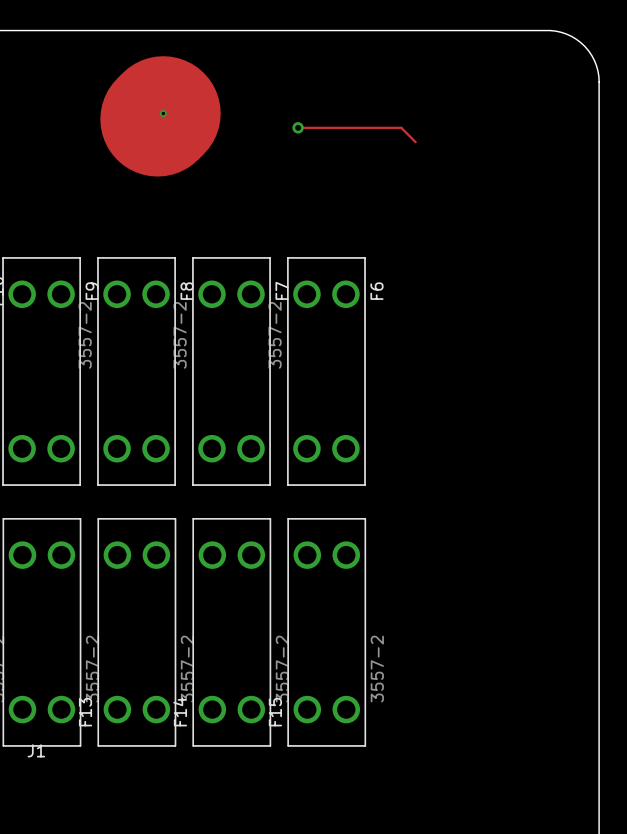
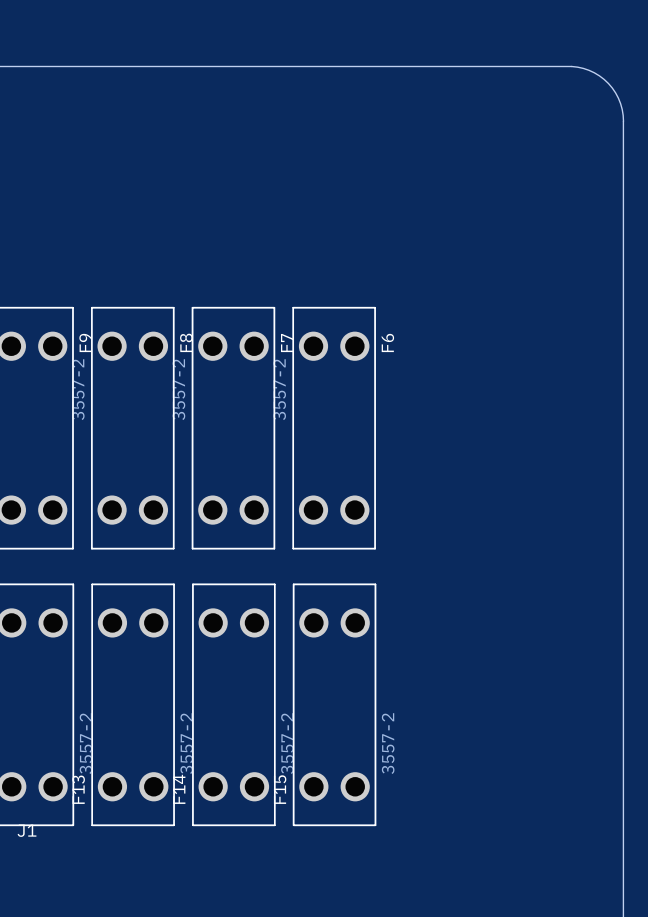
track: (163, 113) (157, 119) -> none
via: (163, 113) -> none
track: (298, 127) (401, 127) (415, 142) -> none
via: (298, 127) -> none

